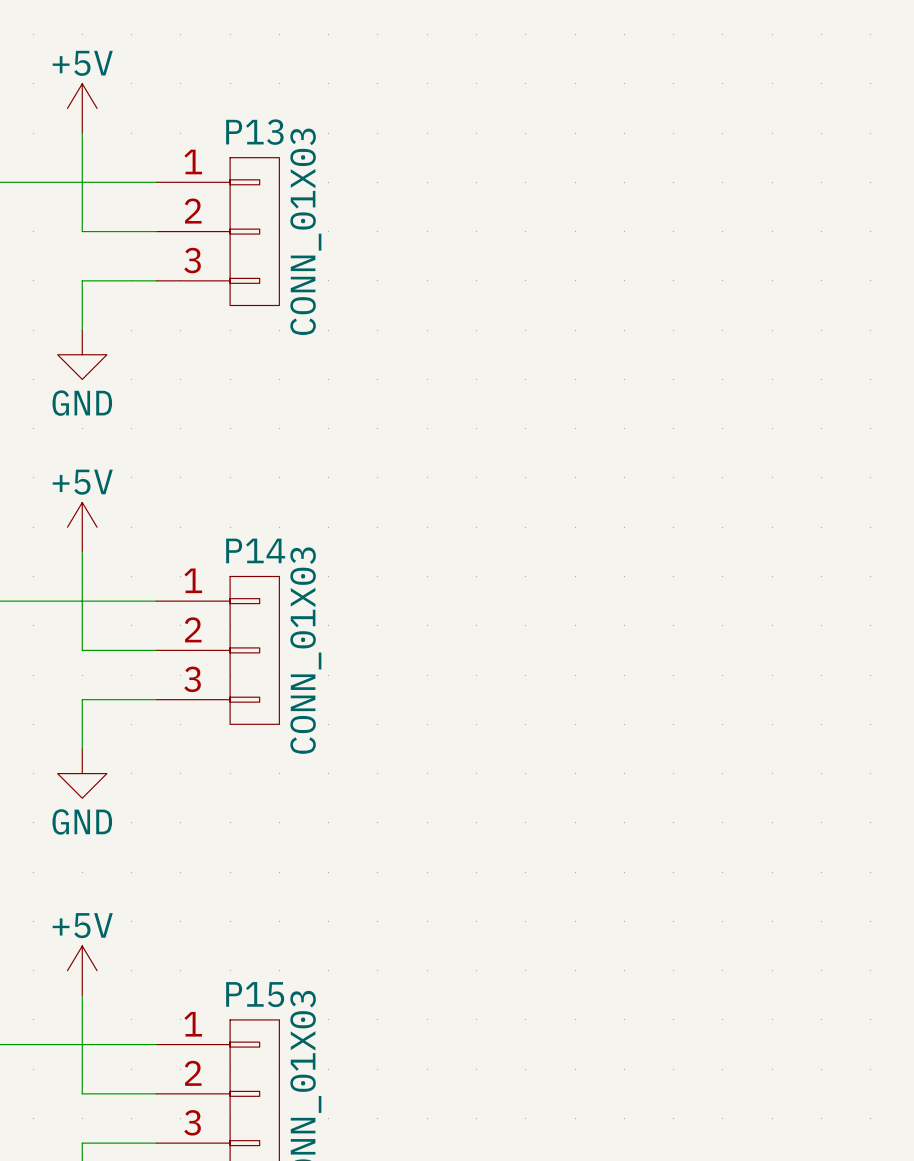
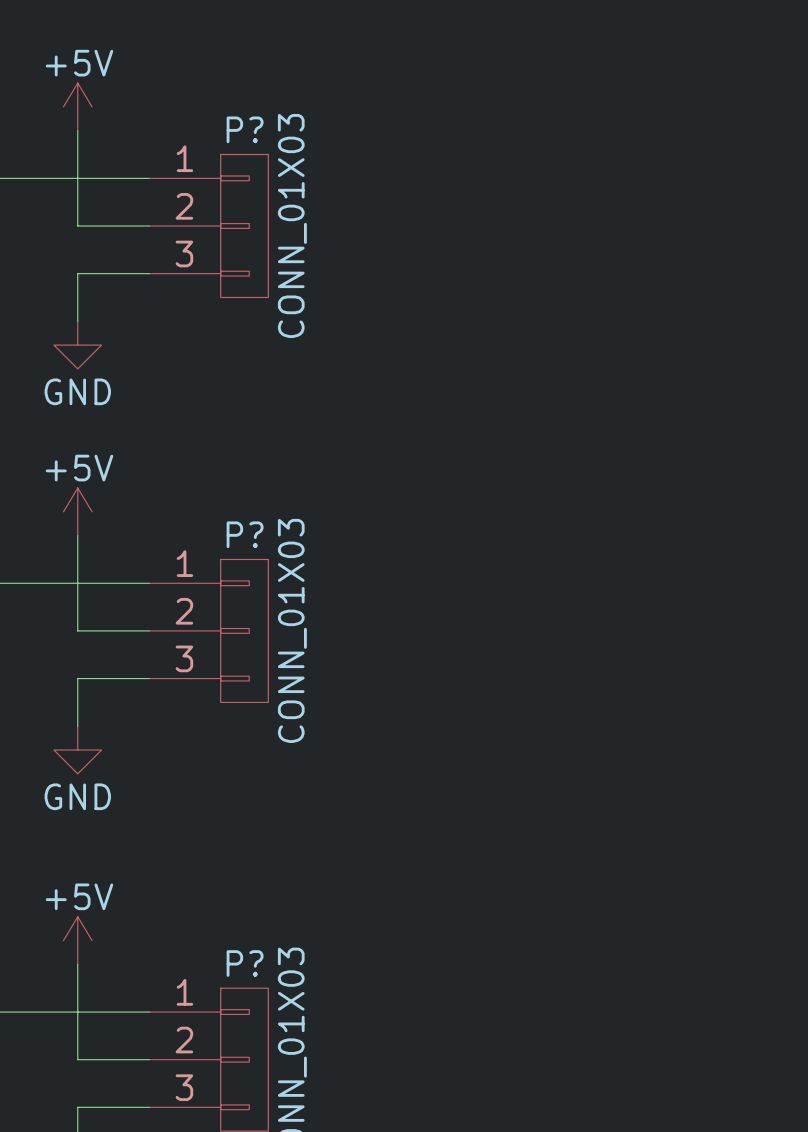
P13 name: P13 (254, 132) -> P? (245, 129)
P14 name: P14 (255, 550) -> P? (245, 534)
P15 name: P15 (255, 994) -> P? (245, 963)

